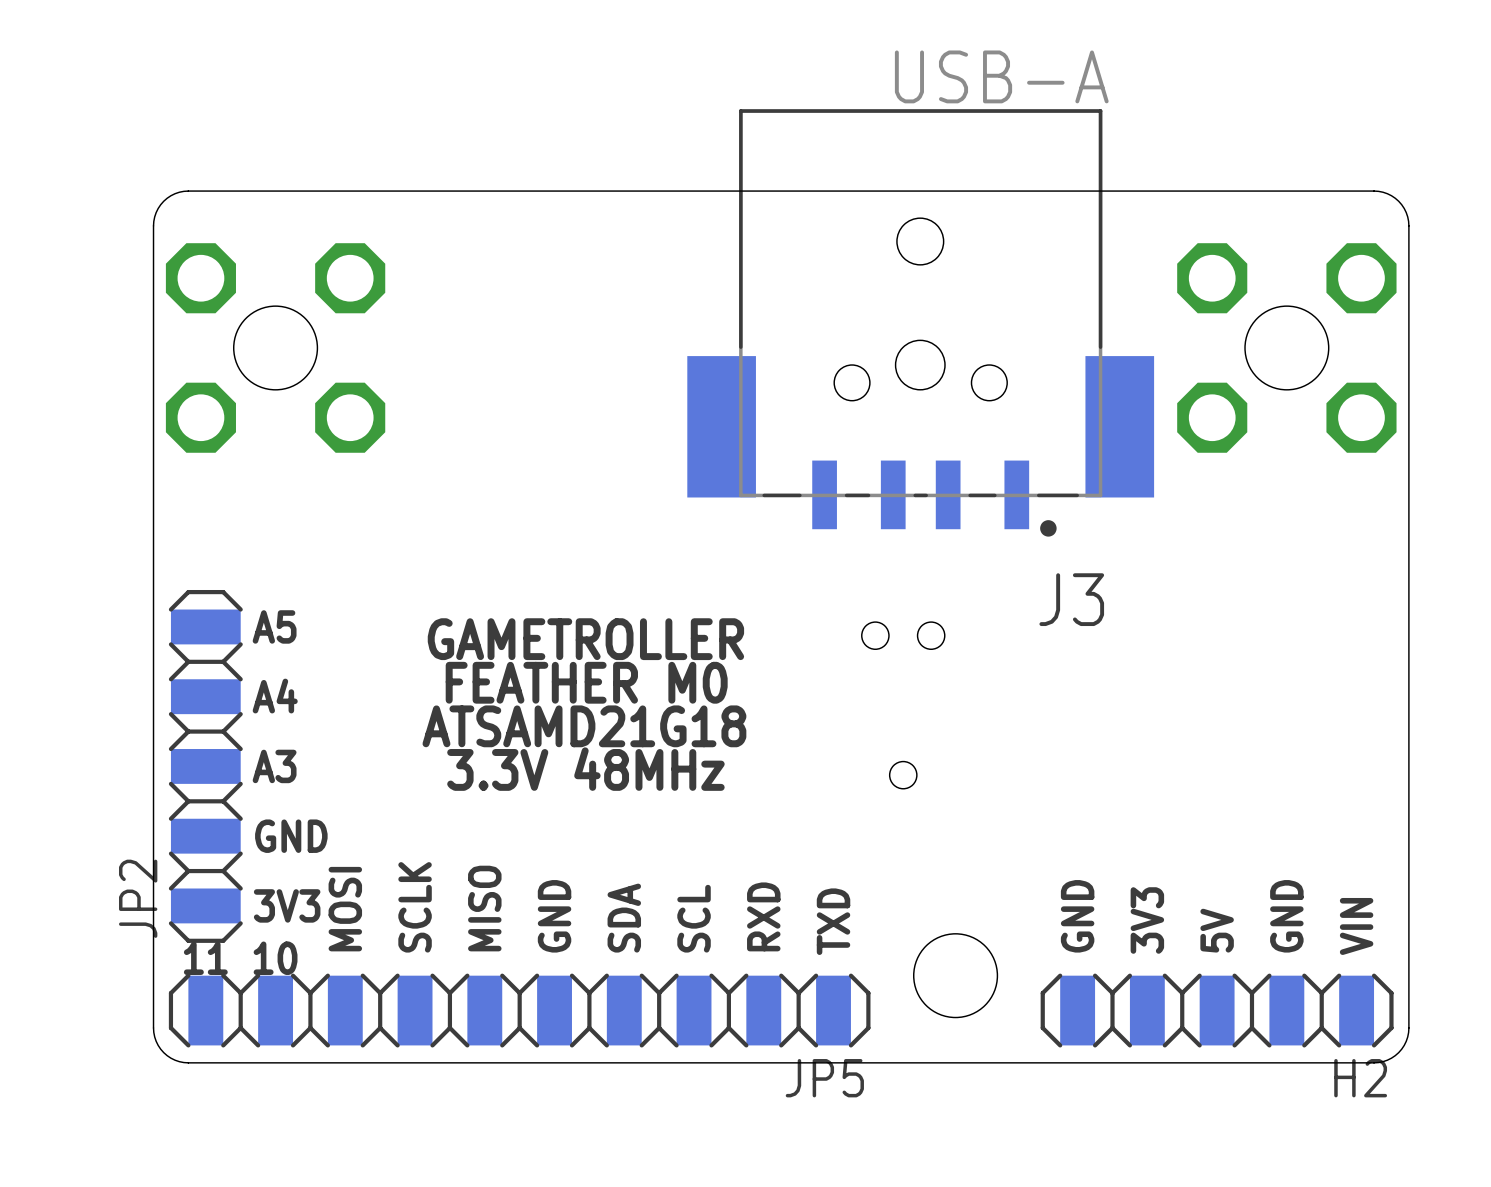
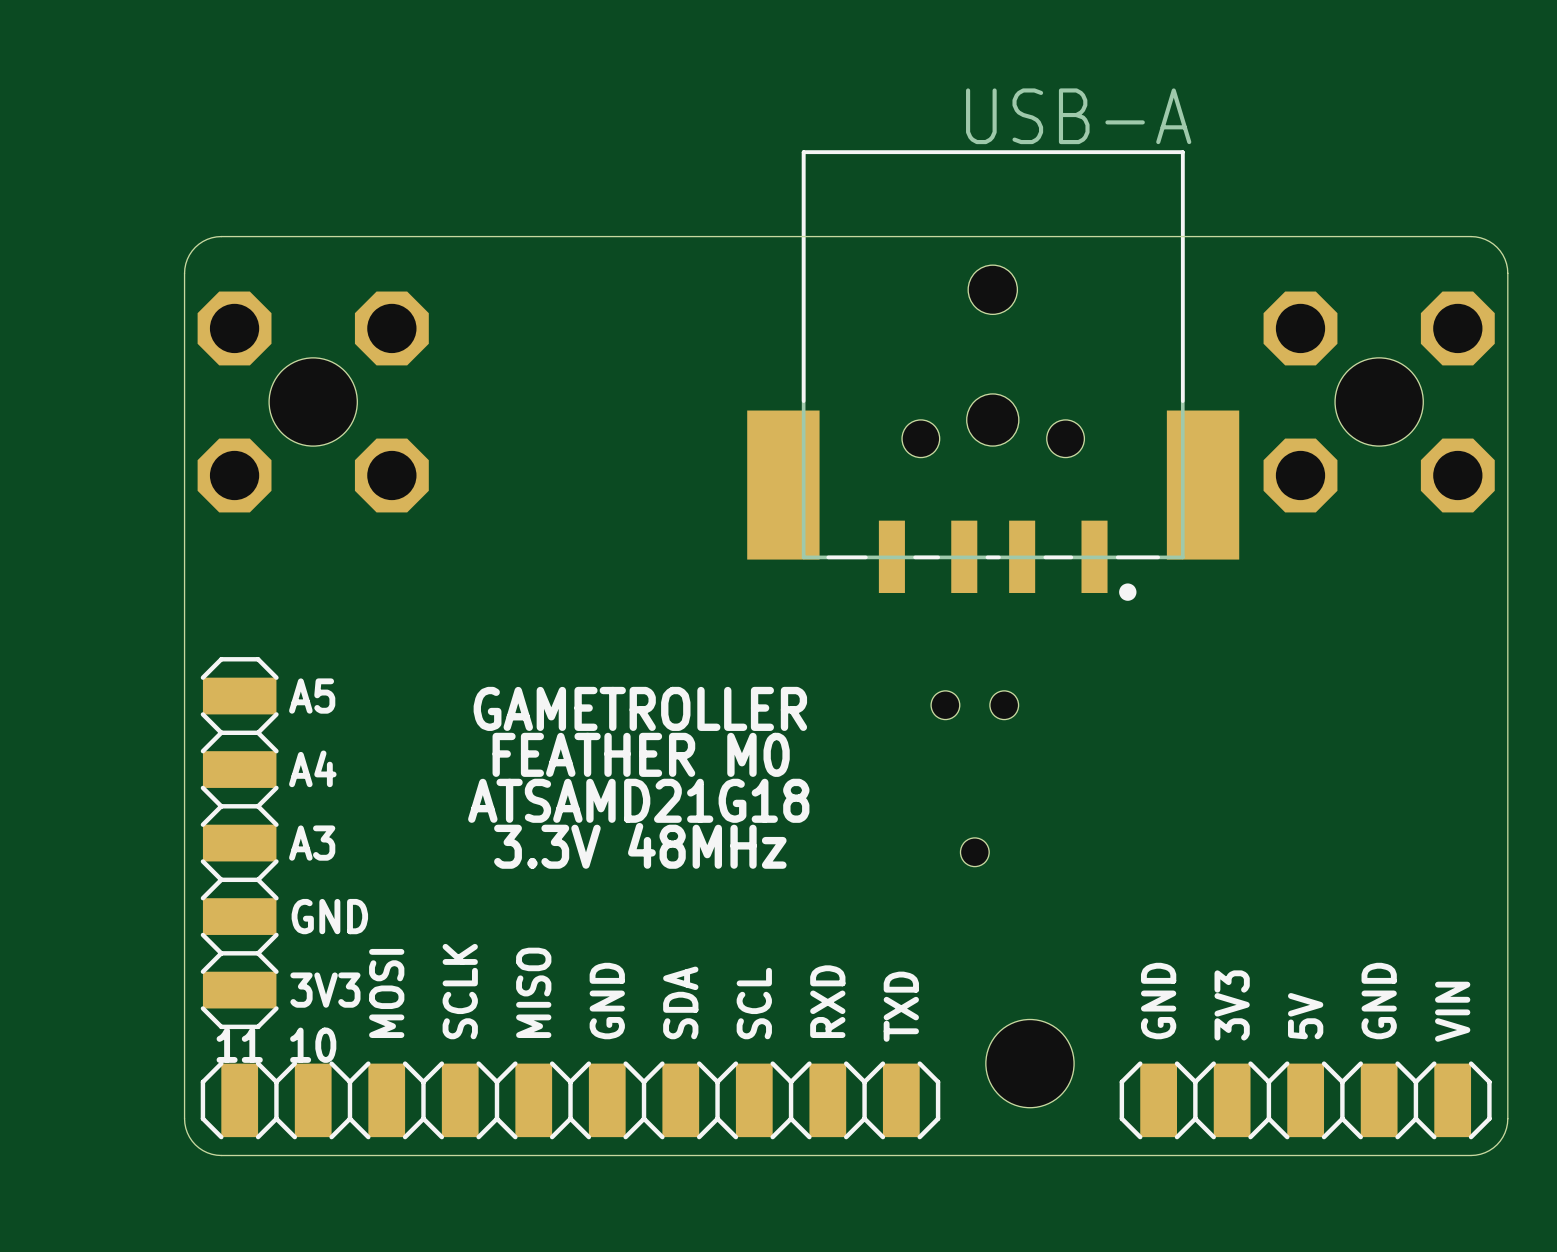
J3 name: J3 (1071, 599) -> none
JP2 name: JP2 (138, 898) -> none
JP5 name: JP5 (824, 1078) -> none
H2 name: H2 (1360, 1078) -> none

